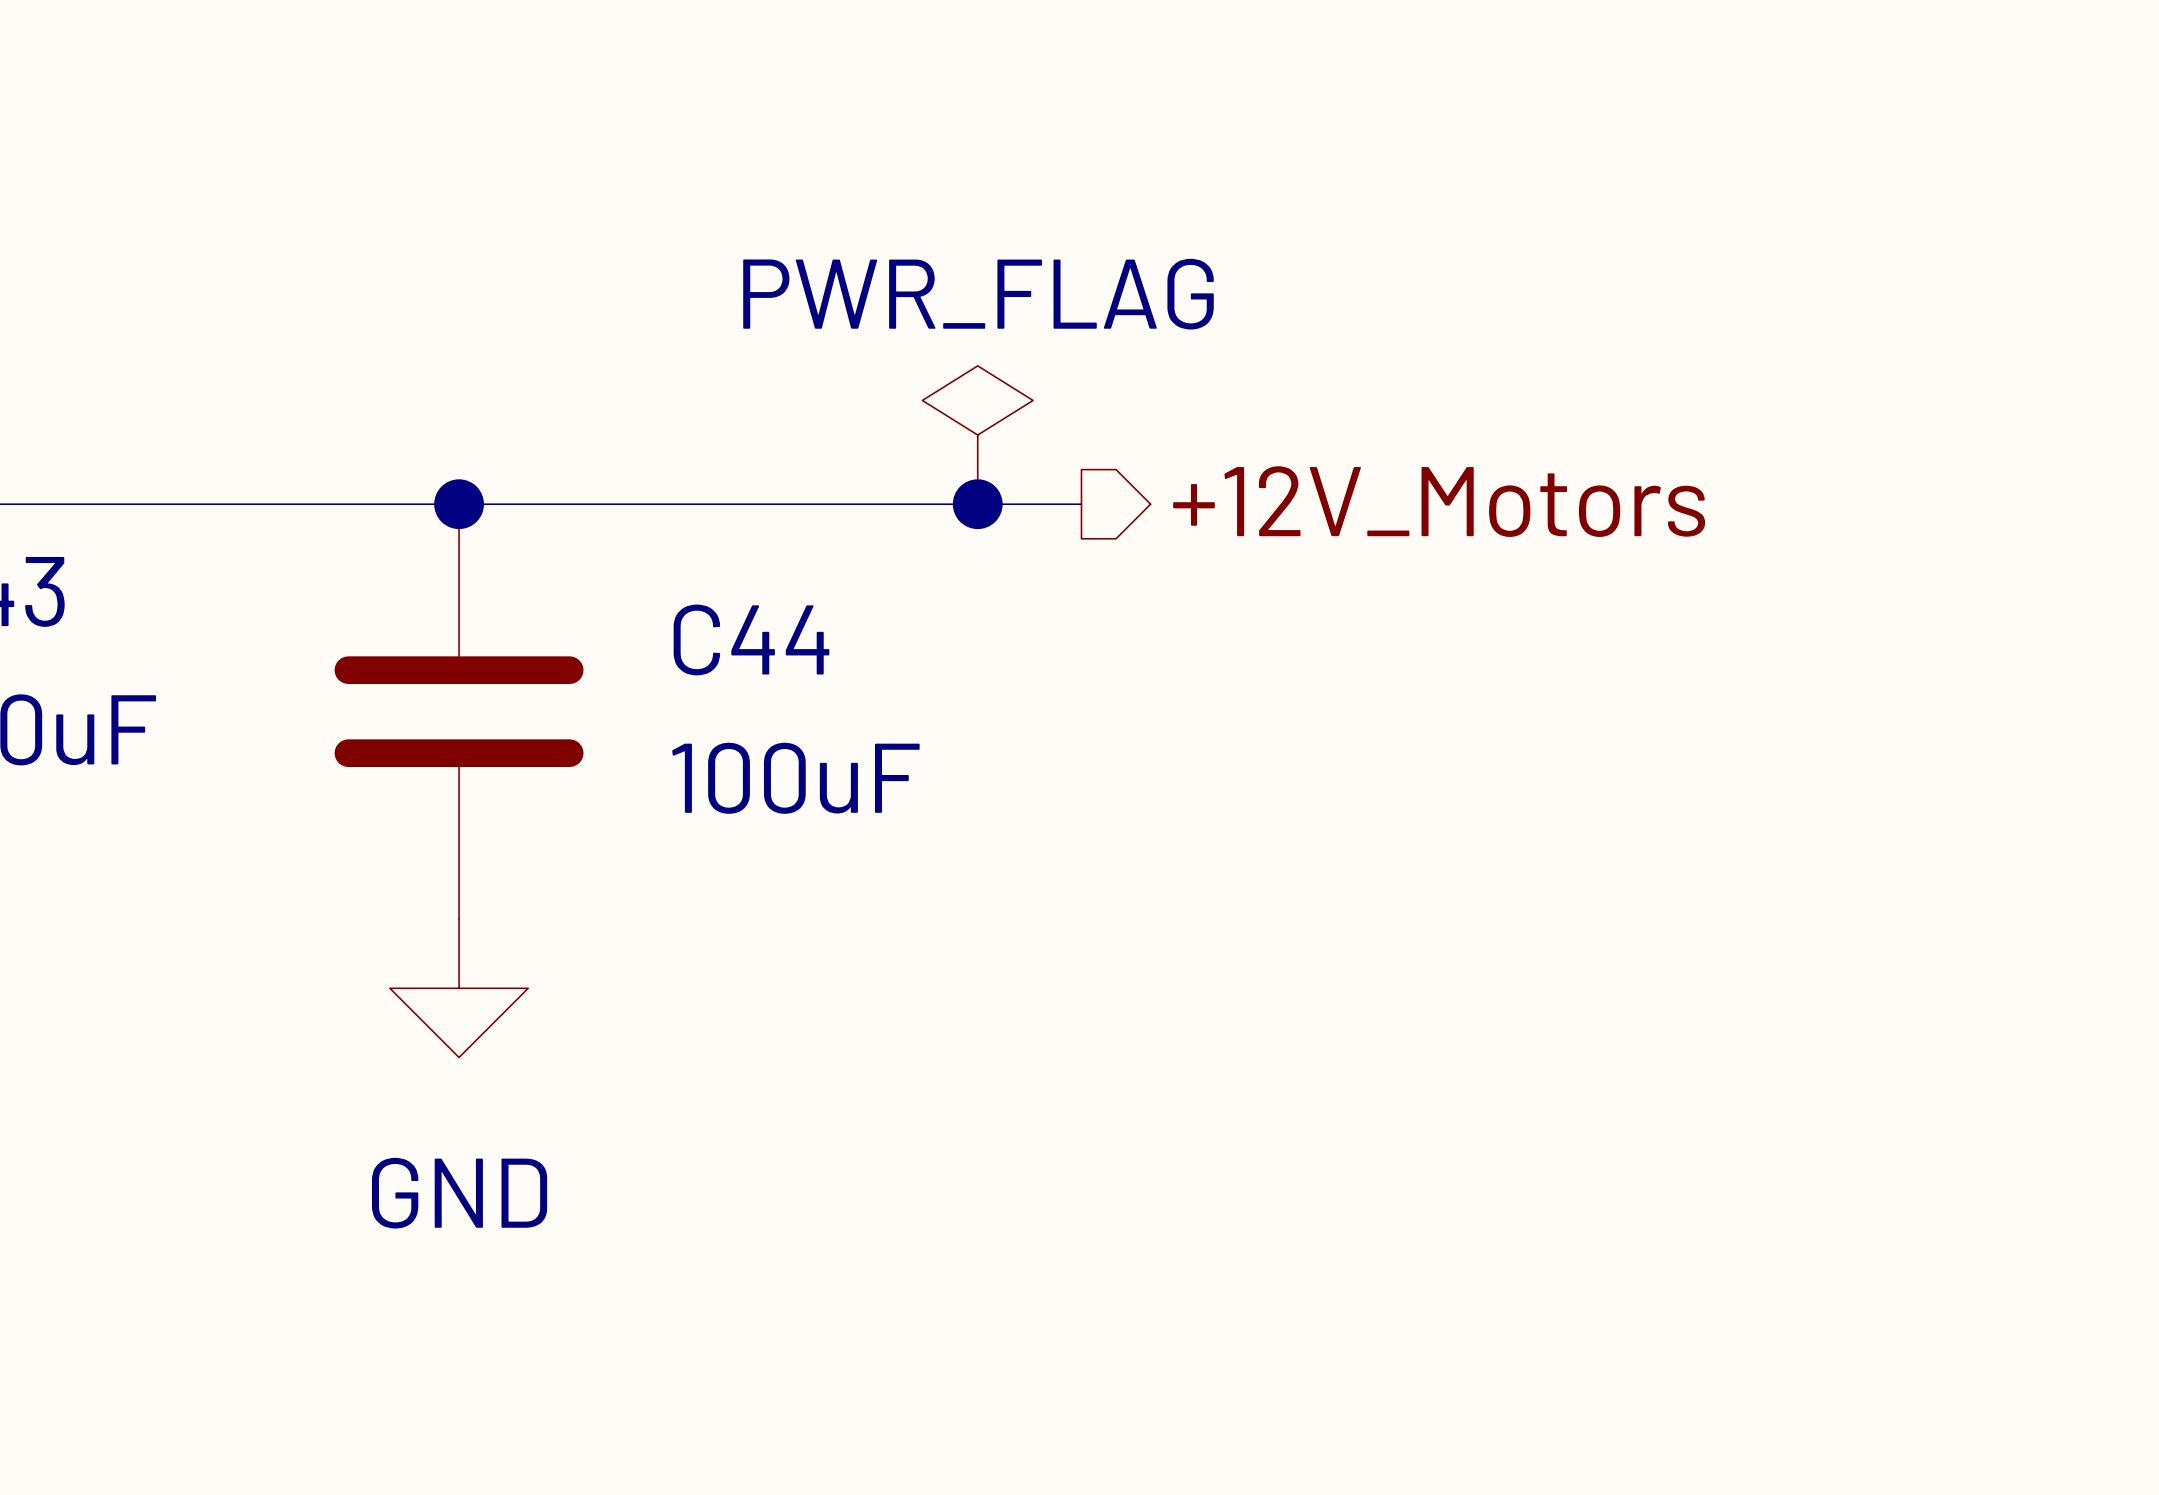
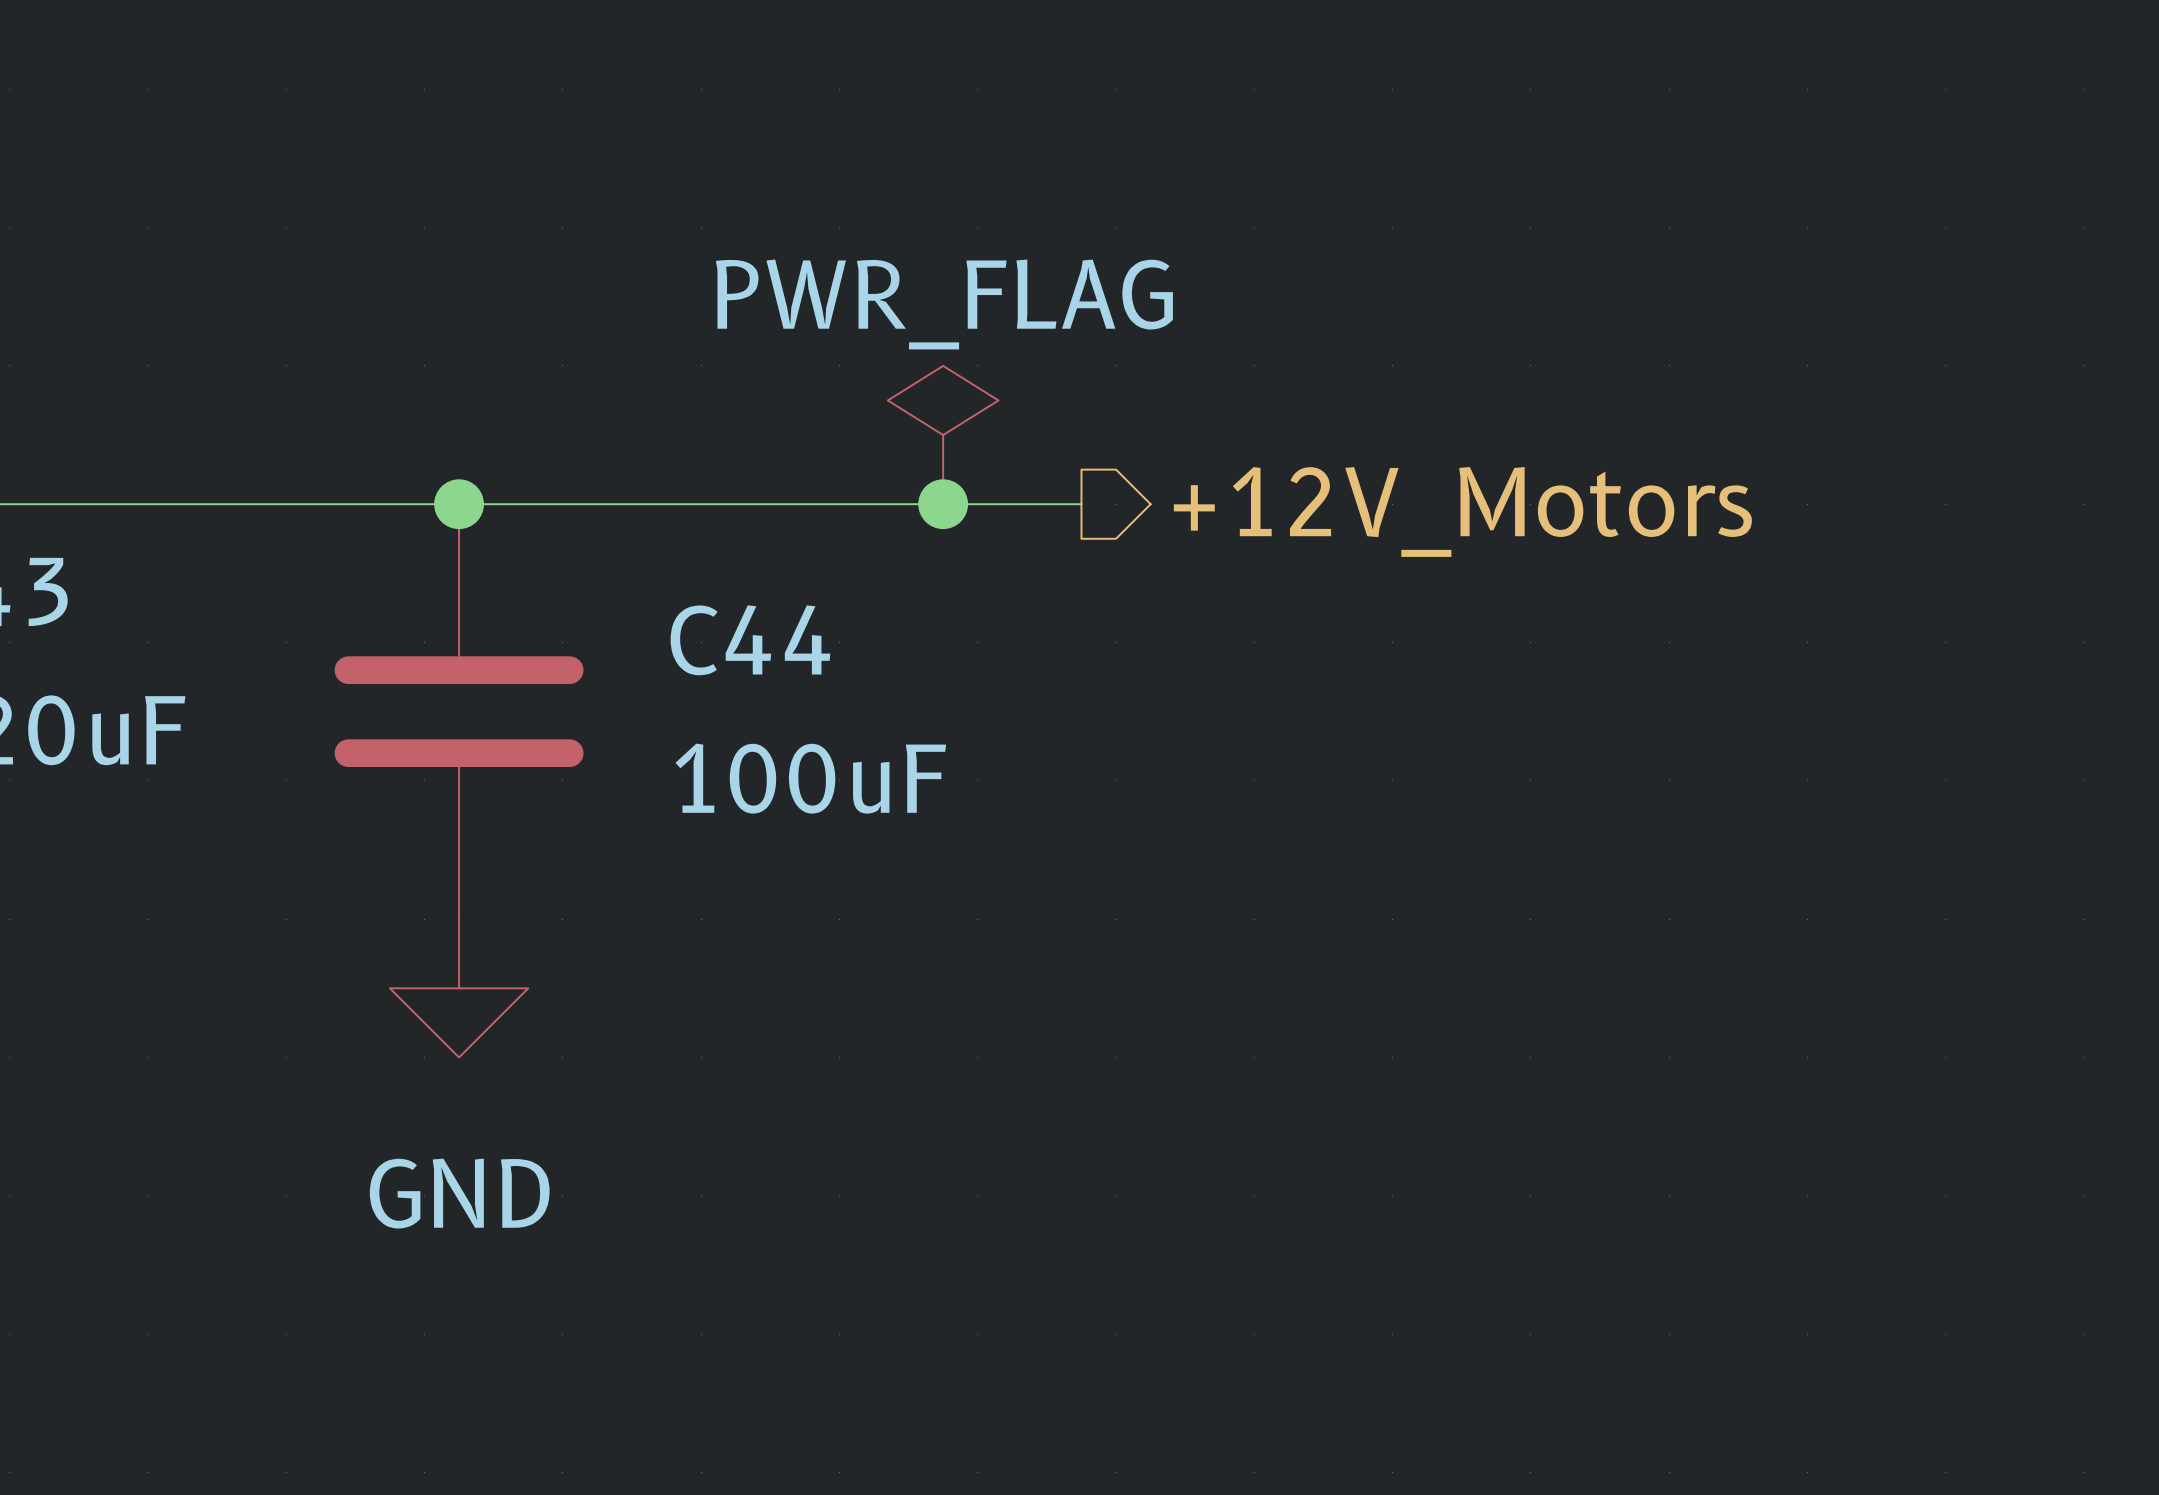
power symbol position: PWR_FLAG (977, 435) -> PWR_FLAG (943, 435)
junction position: (977, 504) -> (943, 504)

